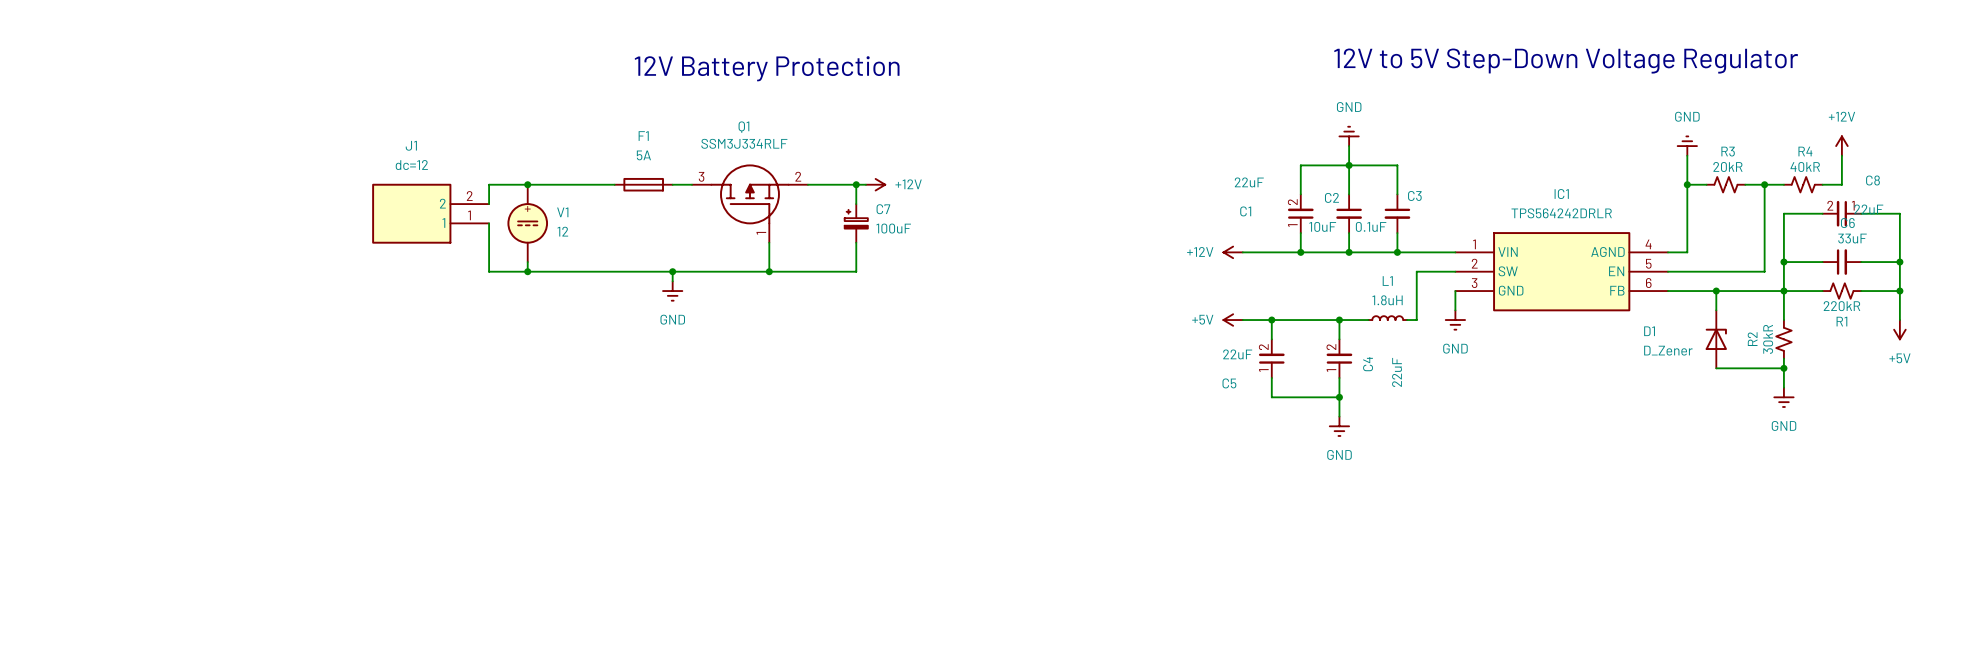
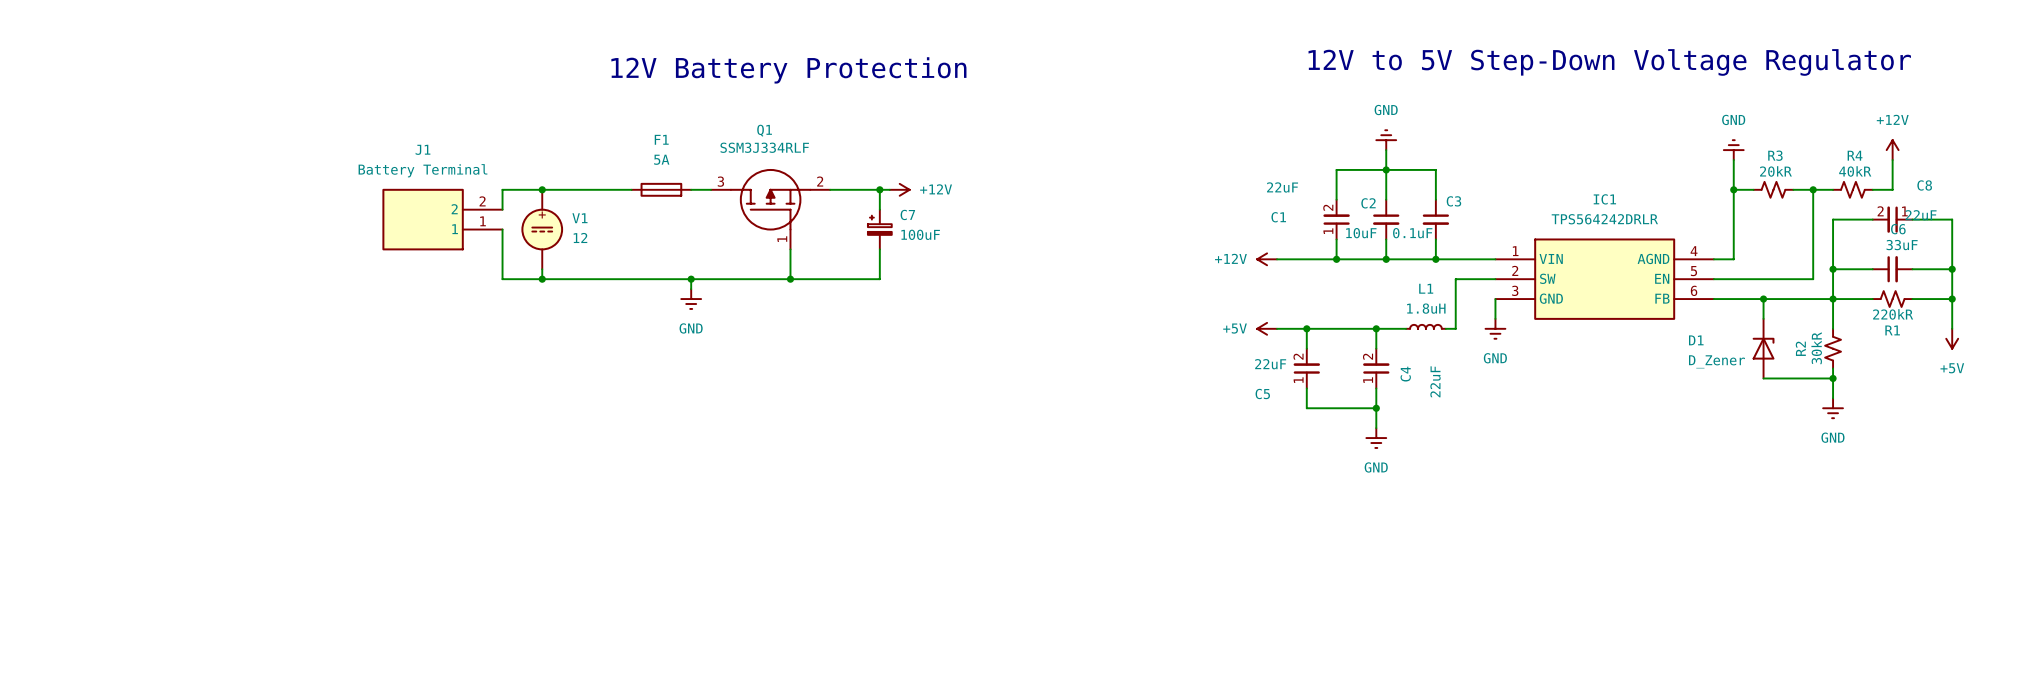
J1 value: dc=12 (411, 165) -> Battery Terminal (422, 170)

